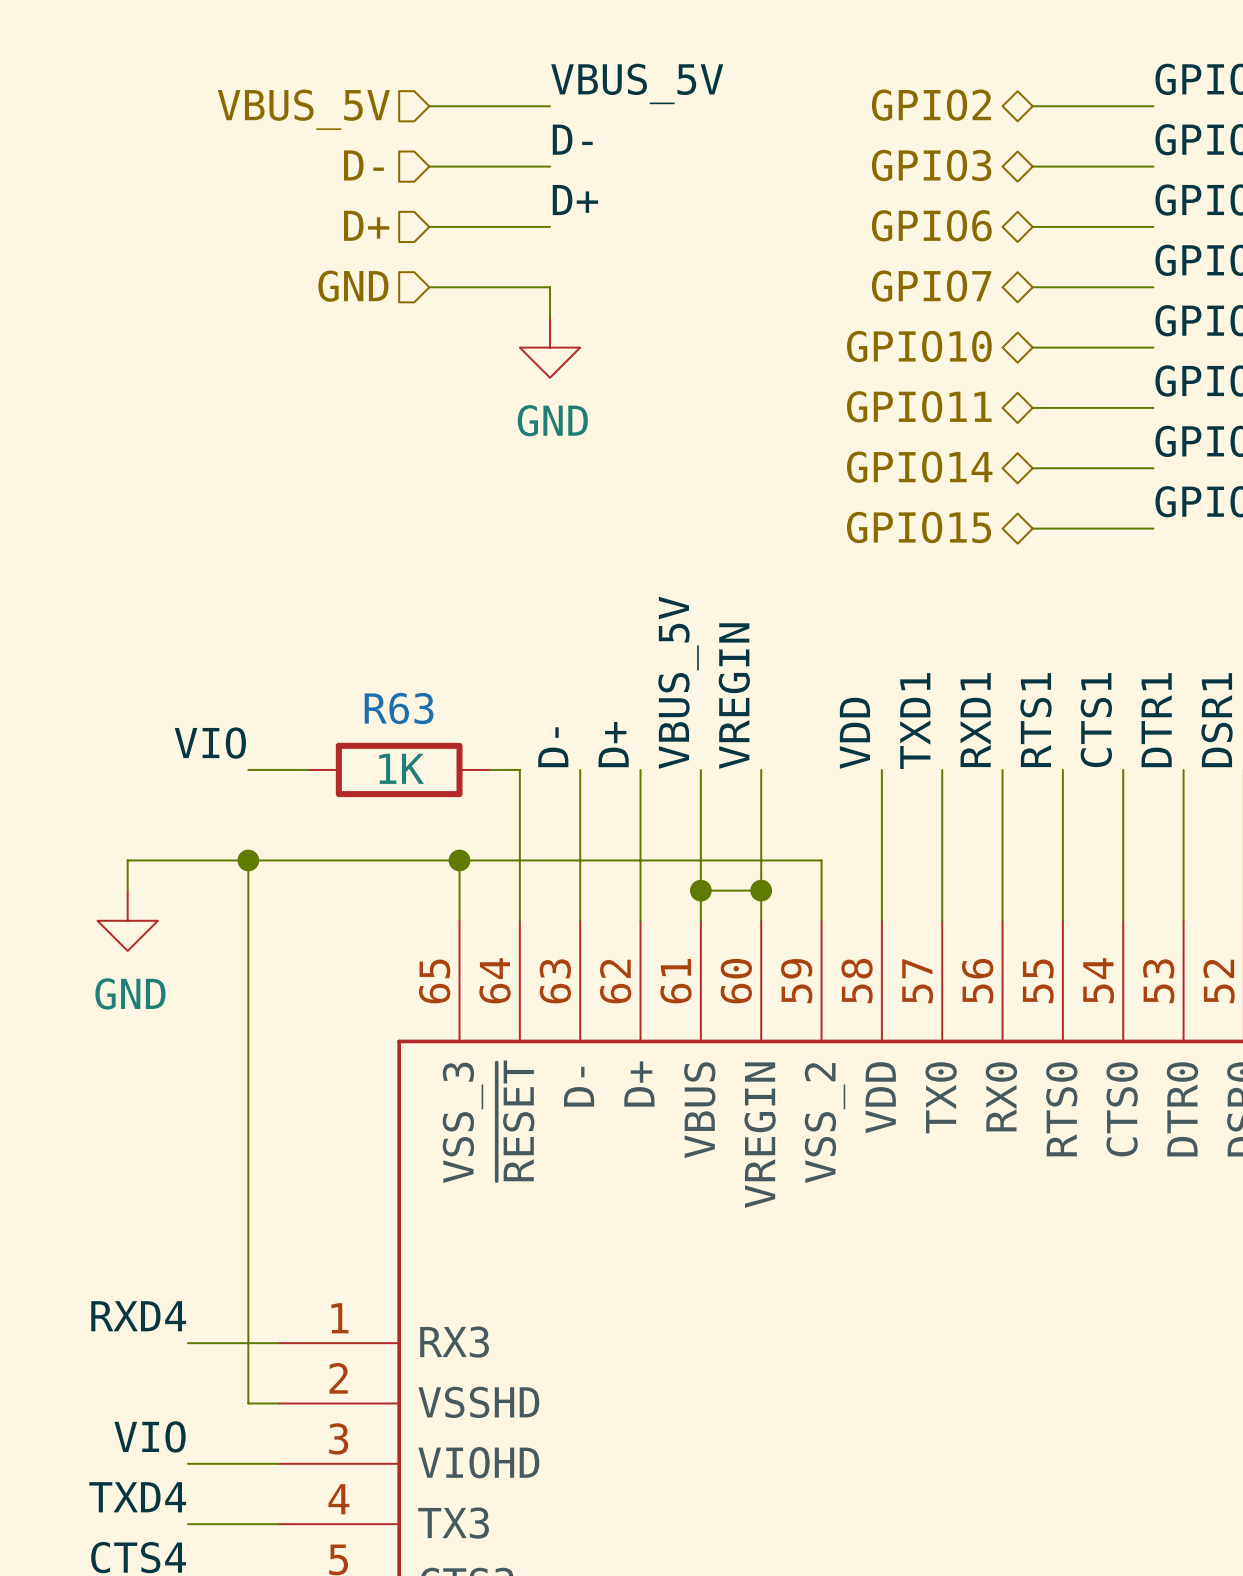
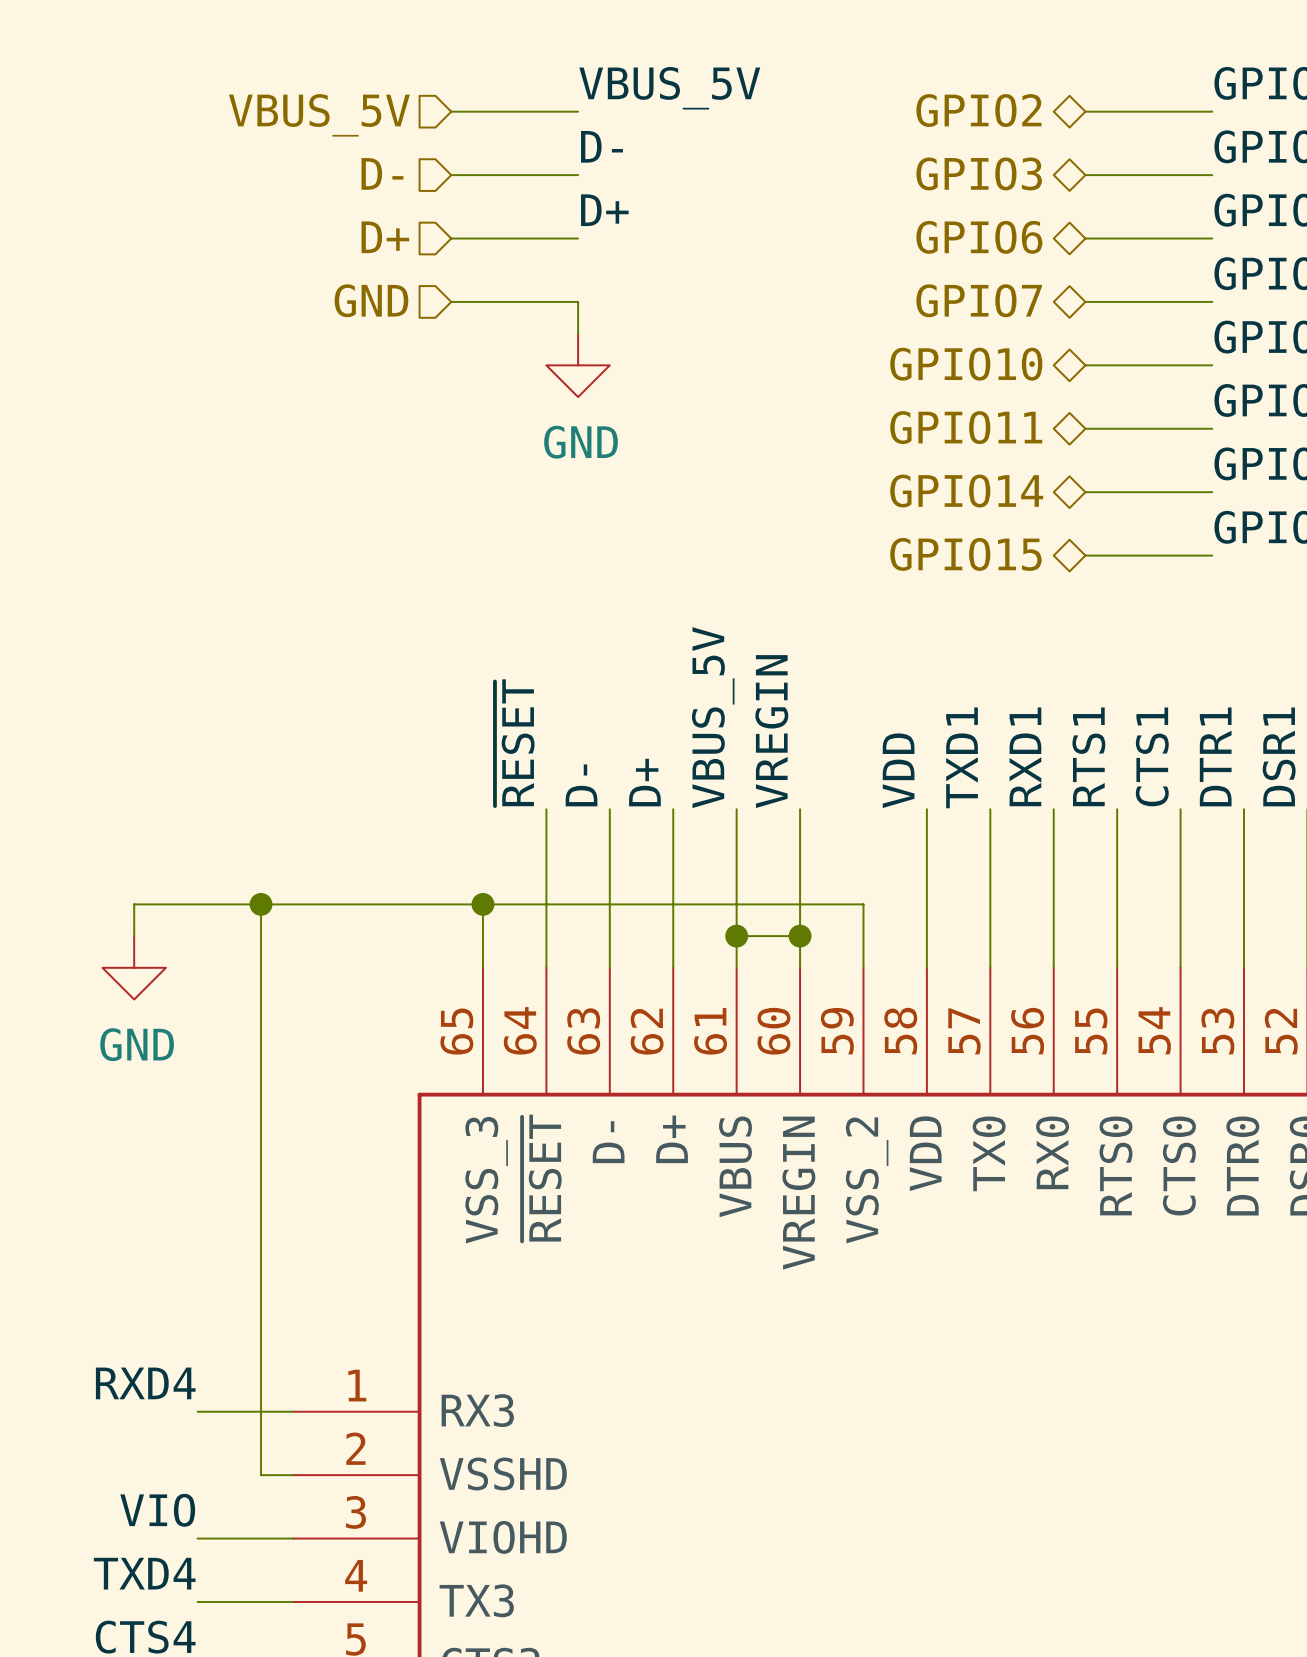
label: none -> ~{RESET} (514, 742)
label: VIO (210, 743) -> none
wire: (248, 769) (308, 769) -> none
R63: 1K (399, 769) -> none
wire: (489, 769) (519, 769) -> none

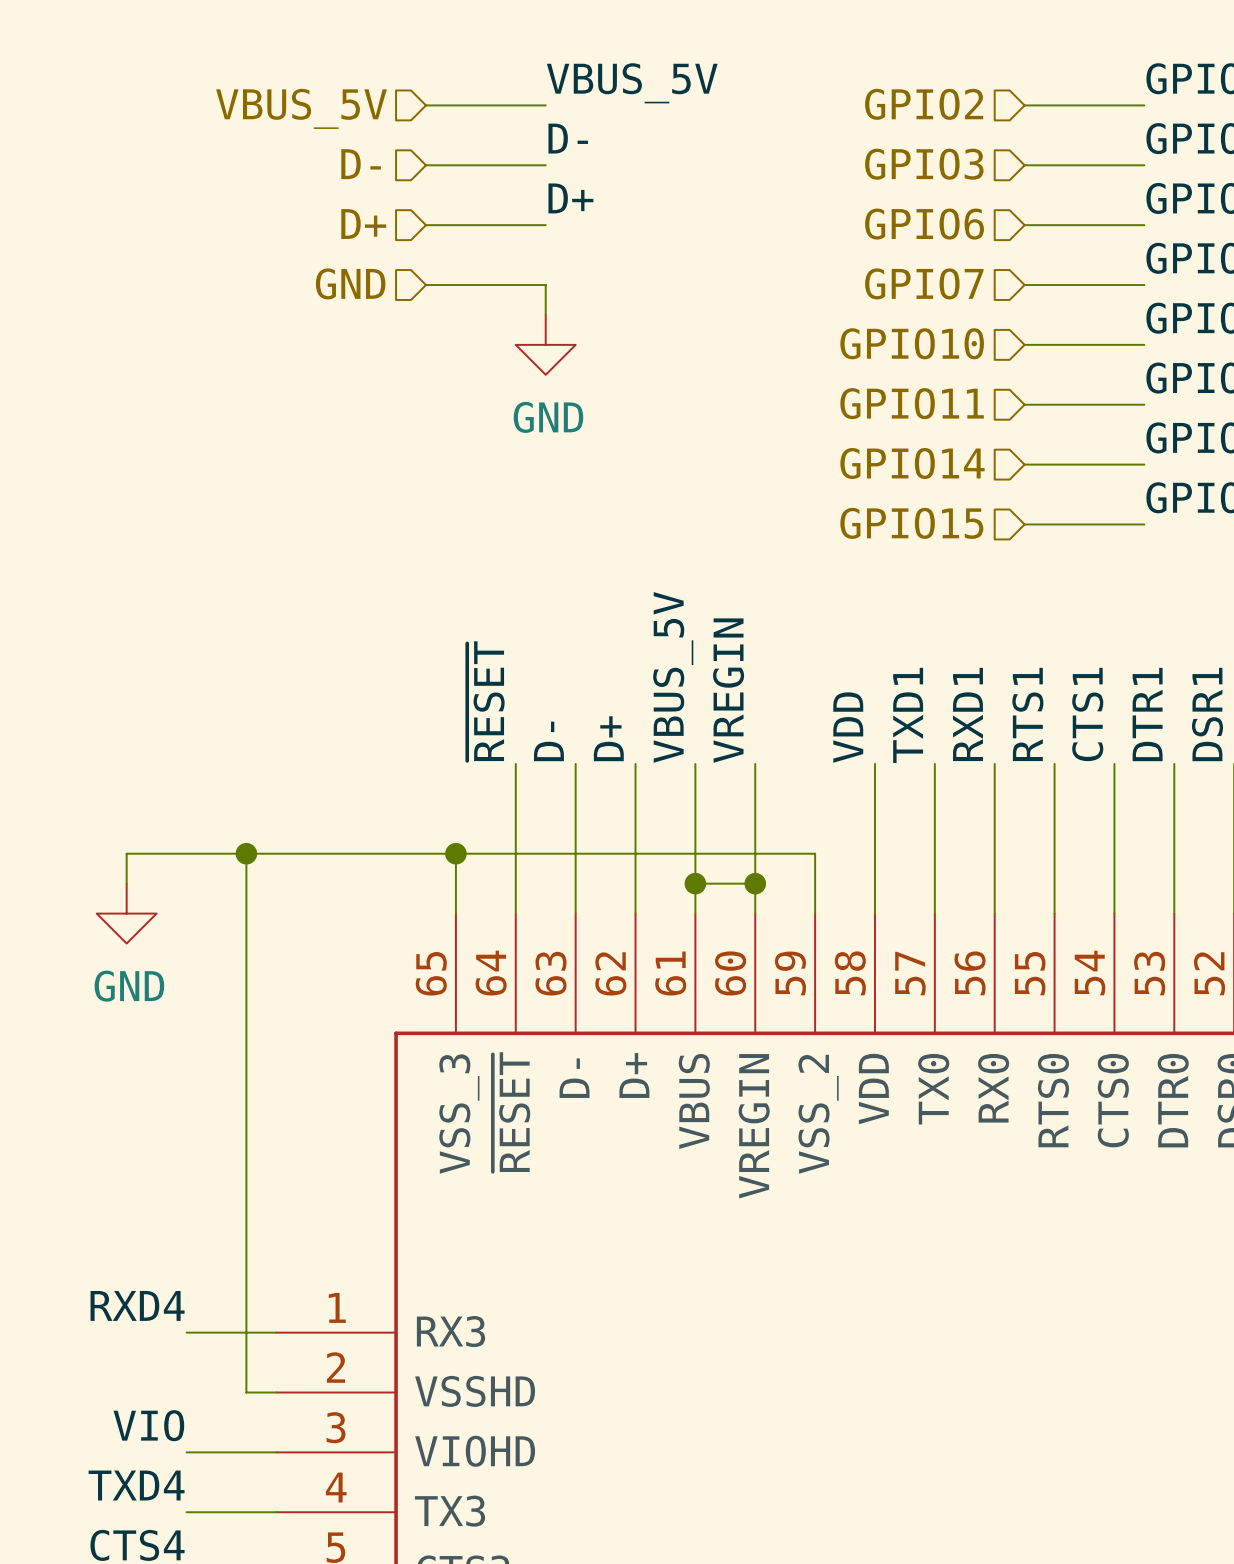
hierarchical label shape: bidirectional (978, 110) -> input (924, 104)
hierarchical label shape: bidirectional (979, 173) -> input (924, 164)
hierarchical label shape: bidirectional (979, 237) -> input (924, 224)
hierarchical label shape: bidirectional (979, 300) -> input (924, 283)
hierarchical label shape: bidirectional (966, 364) -> input (912, 343)
hierarchical label shape: bidirectional (966, 427) -> input (912, 403)
hierarchical label shape: bidirectional (966, 491) -> input (912, 463)
hierarchical label shape: bidirectional (965, 554) -> input (911, 523)

